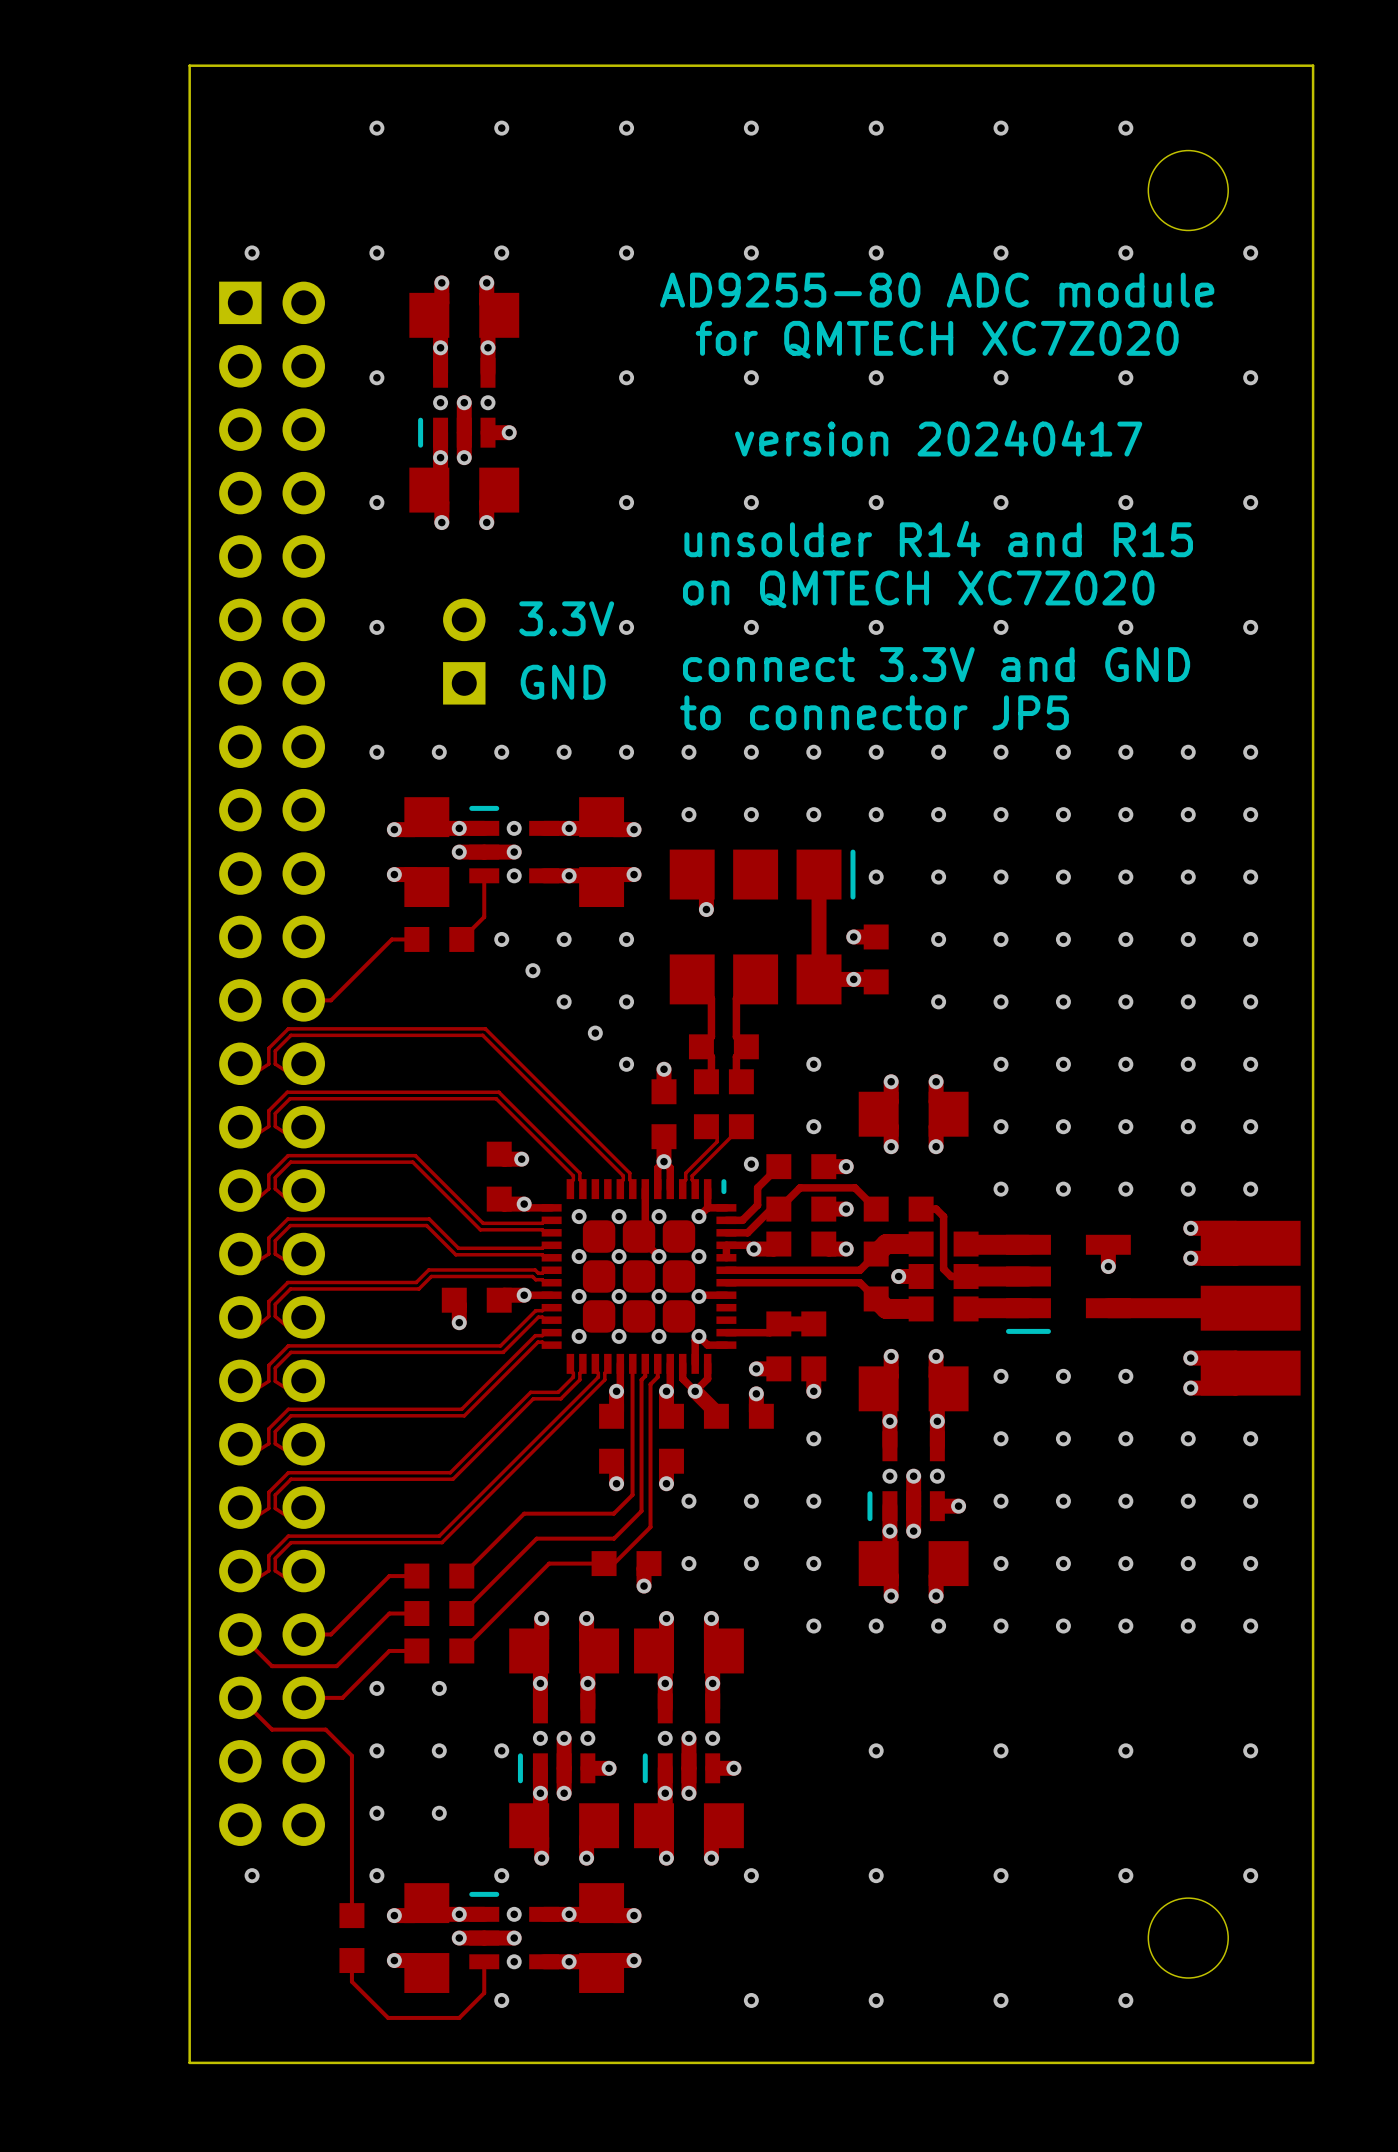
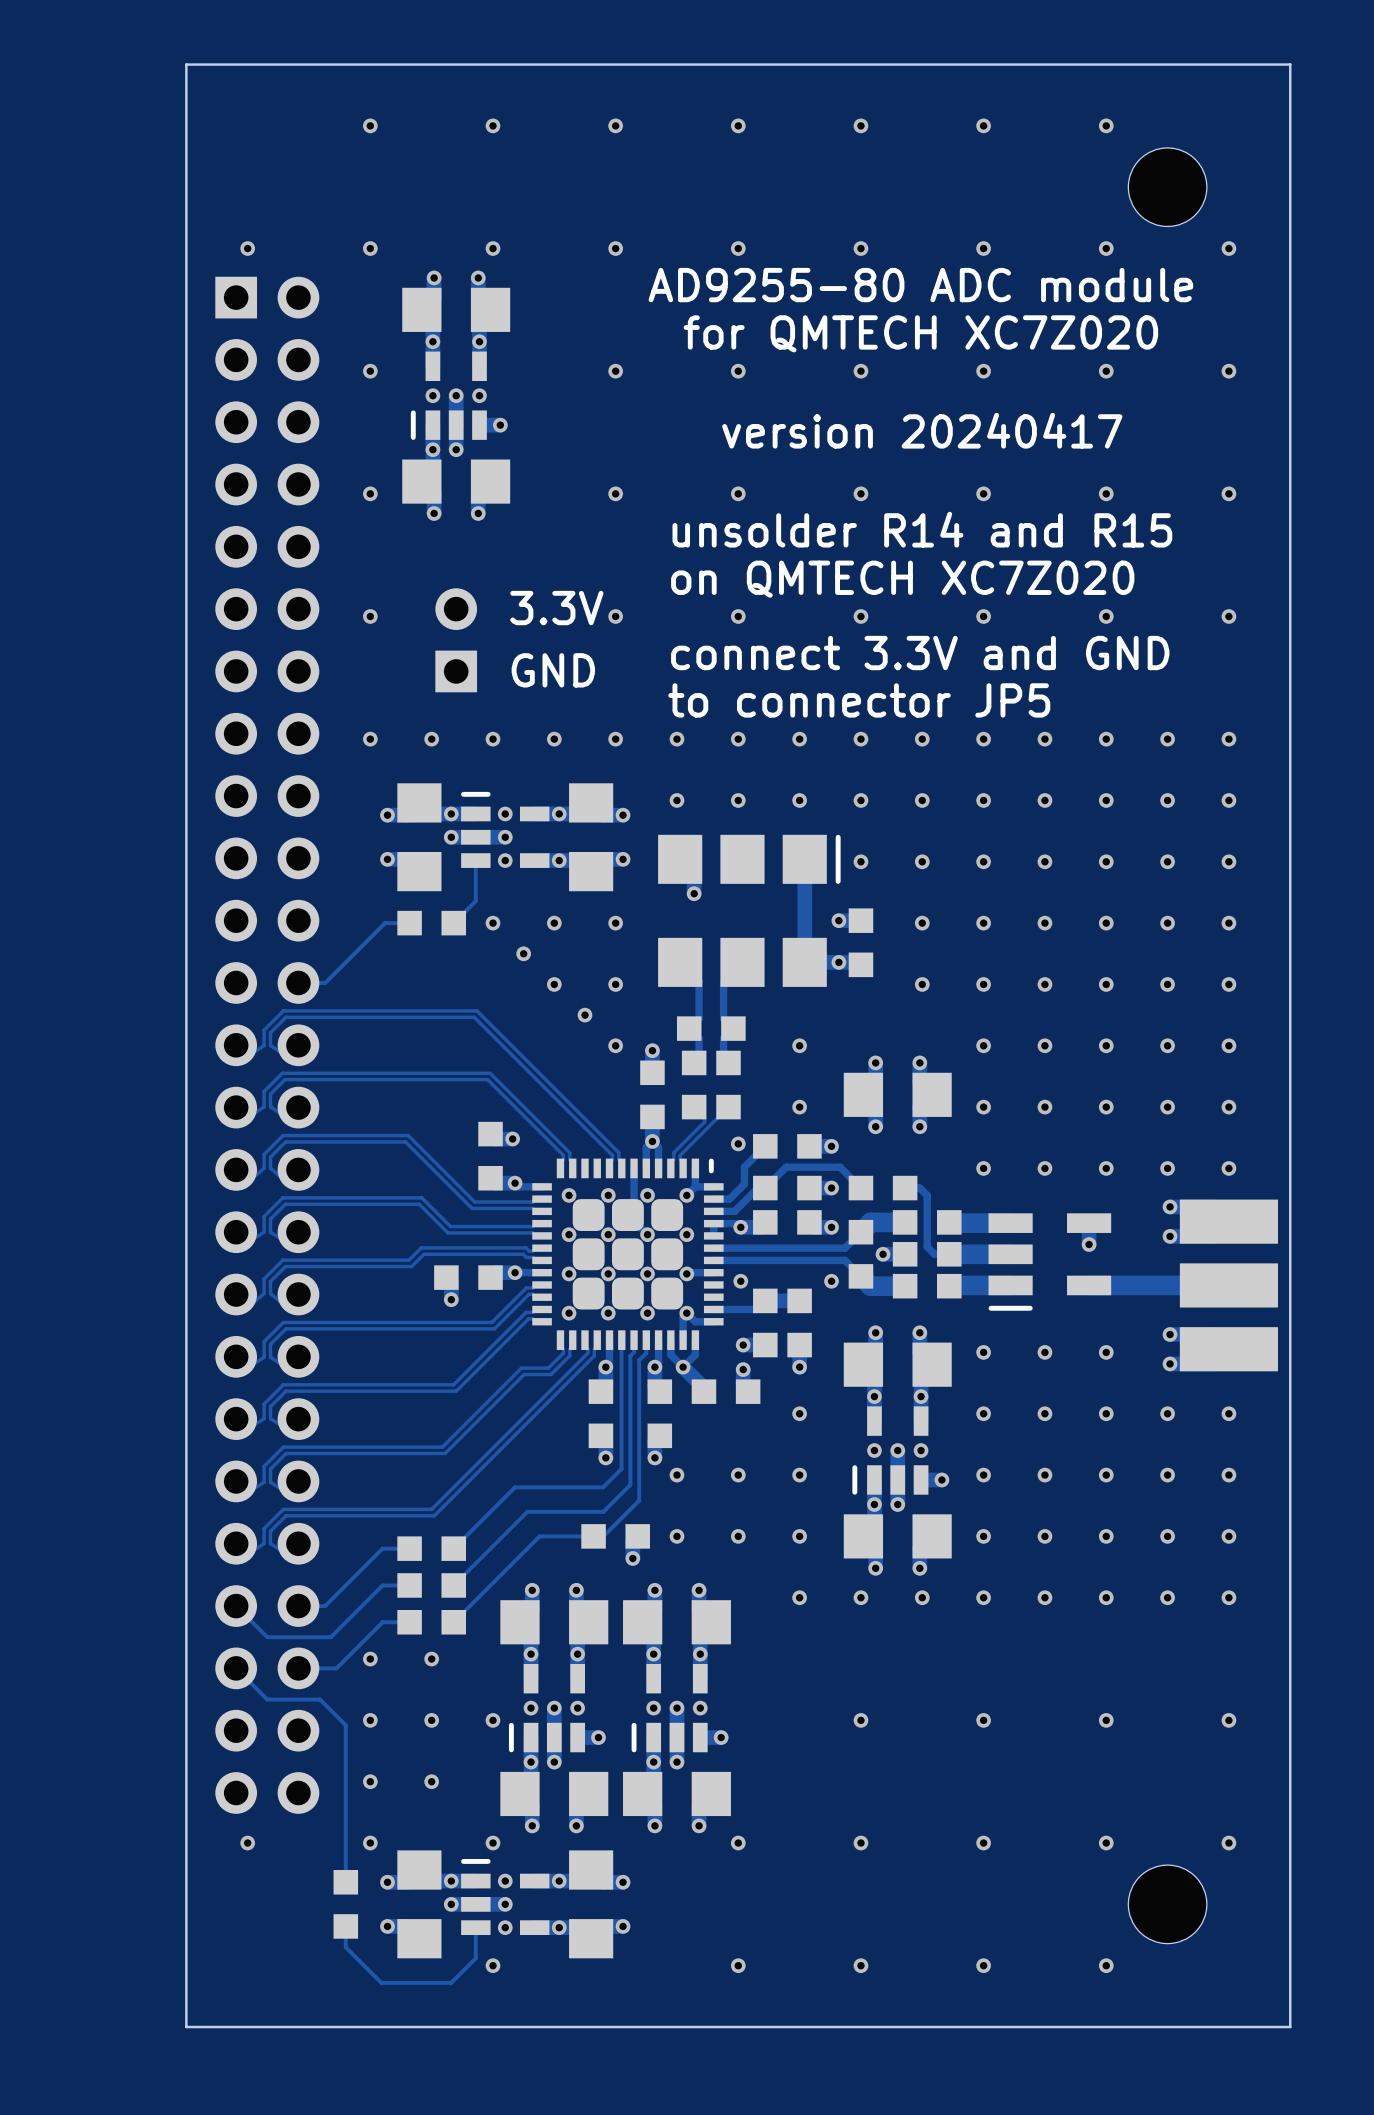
via: none -> (740, 1281)
via: none -> (831, 1281)

